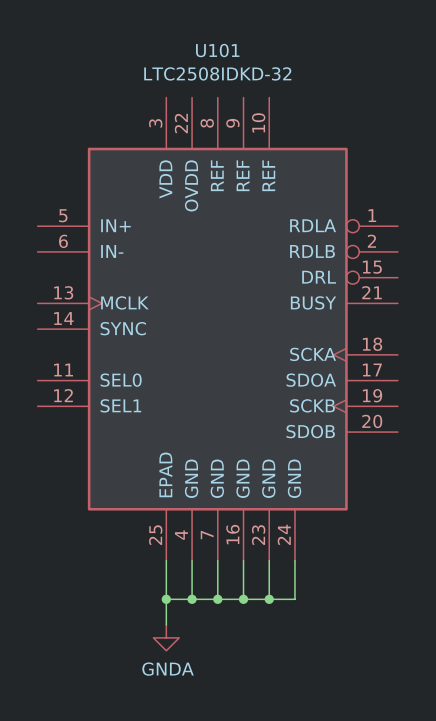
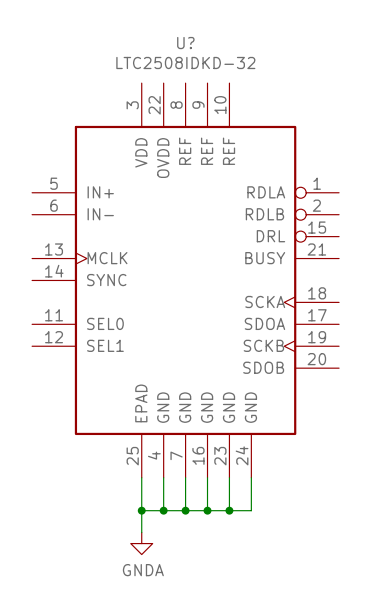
U101 name: U101 (217, 50) -> U? (185, 43)

